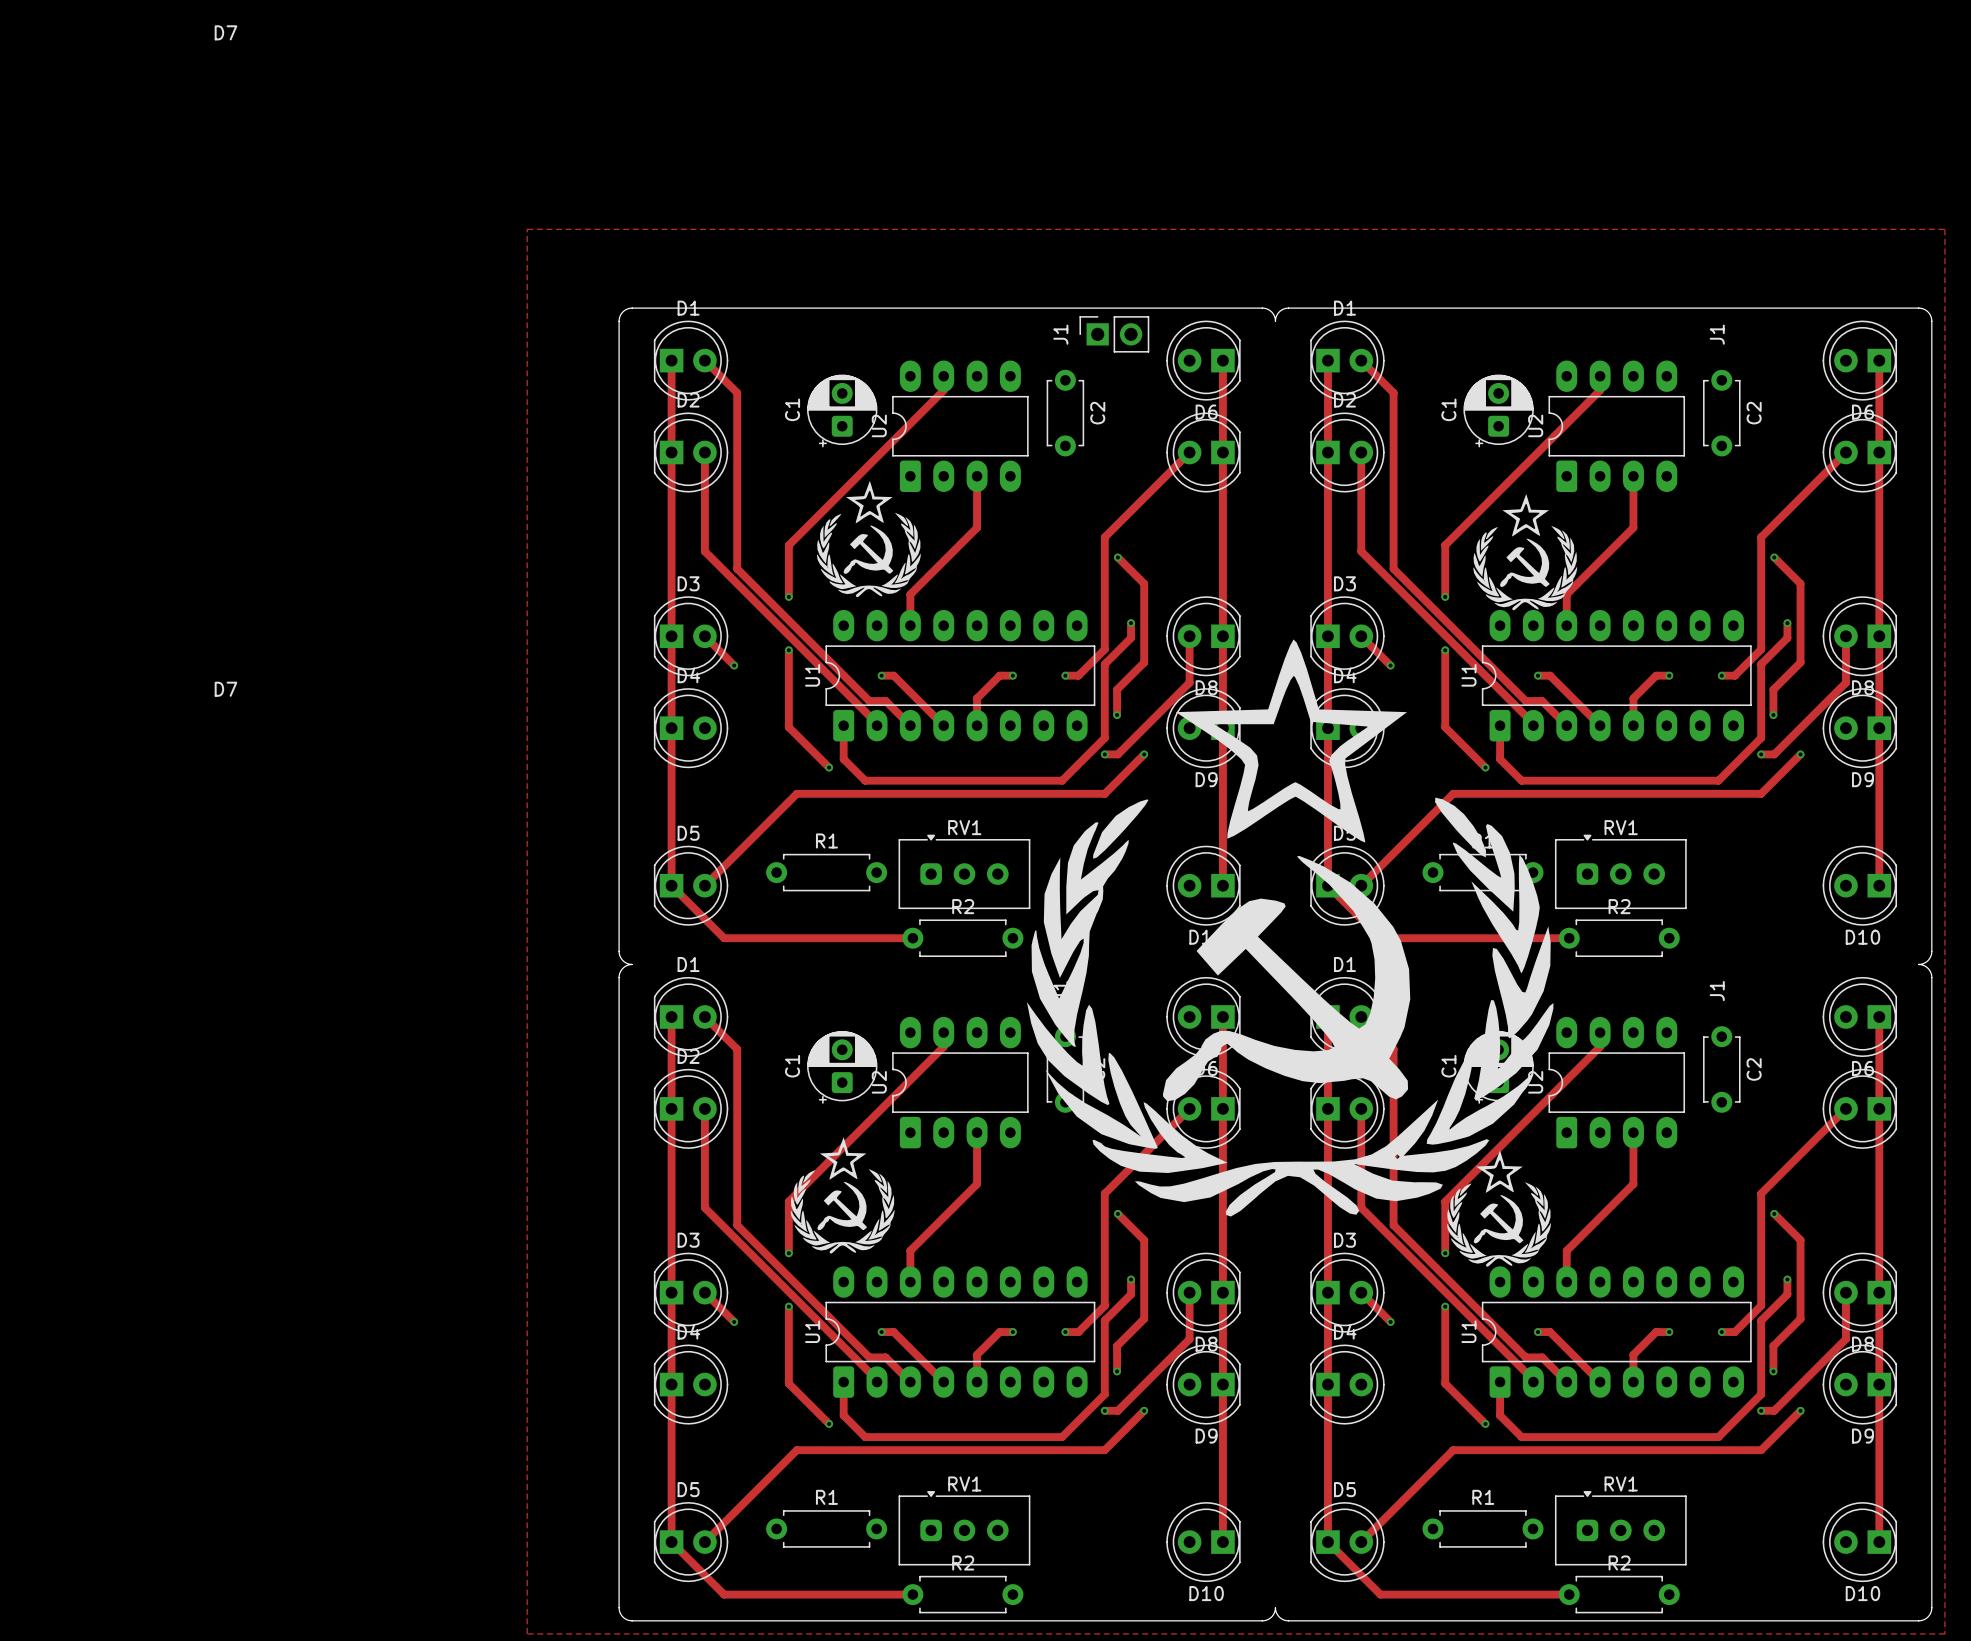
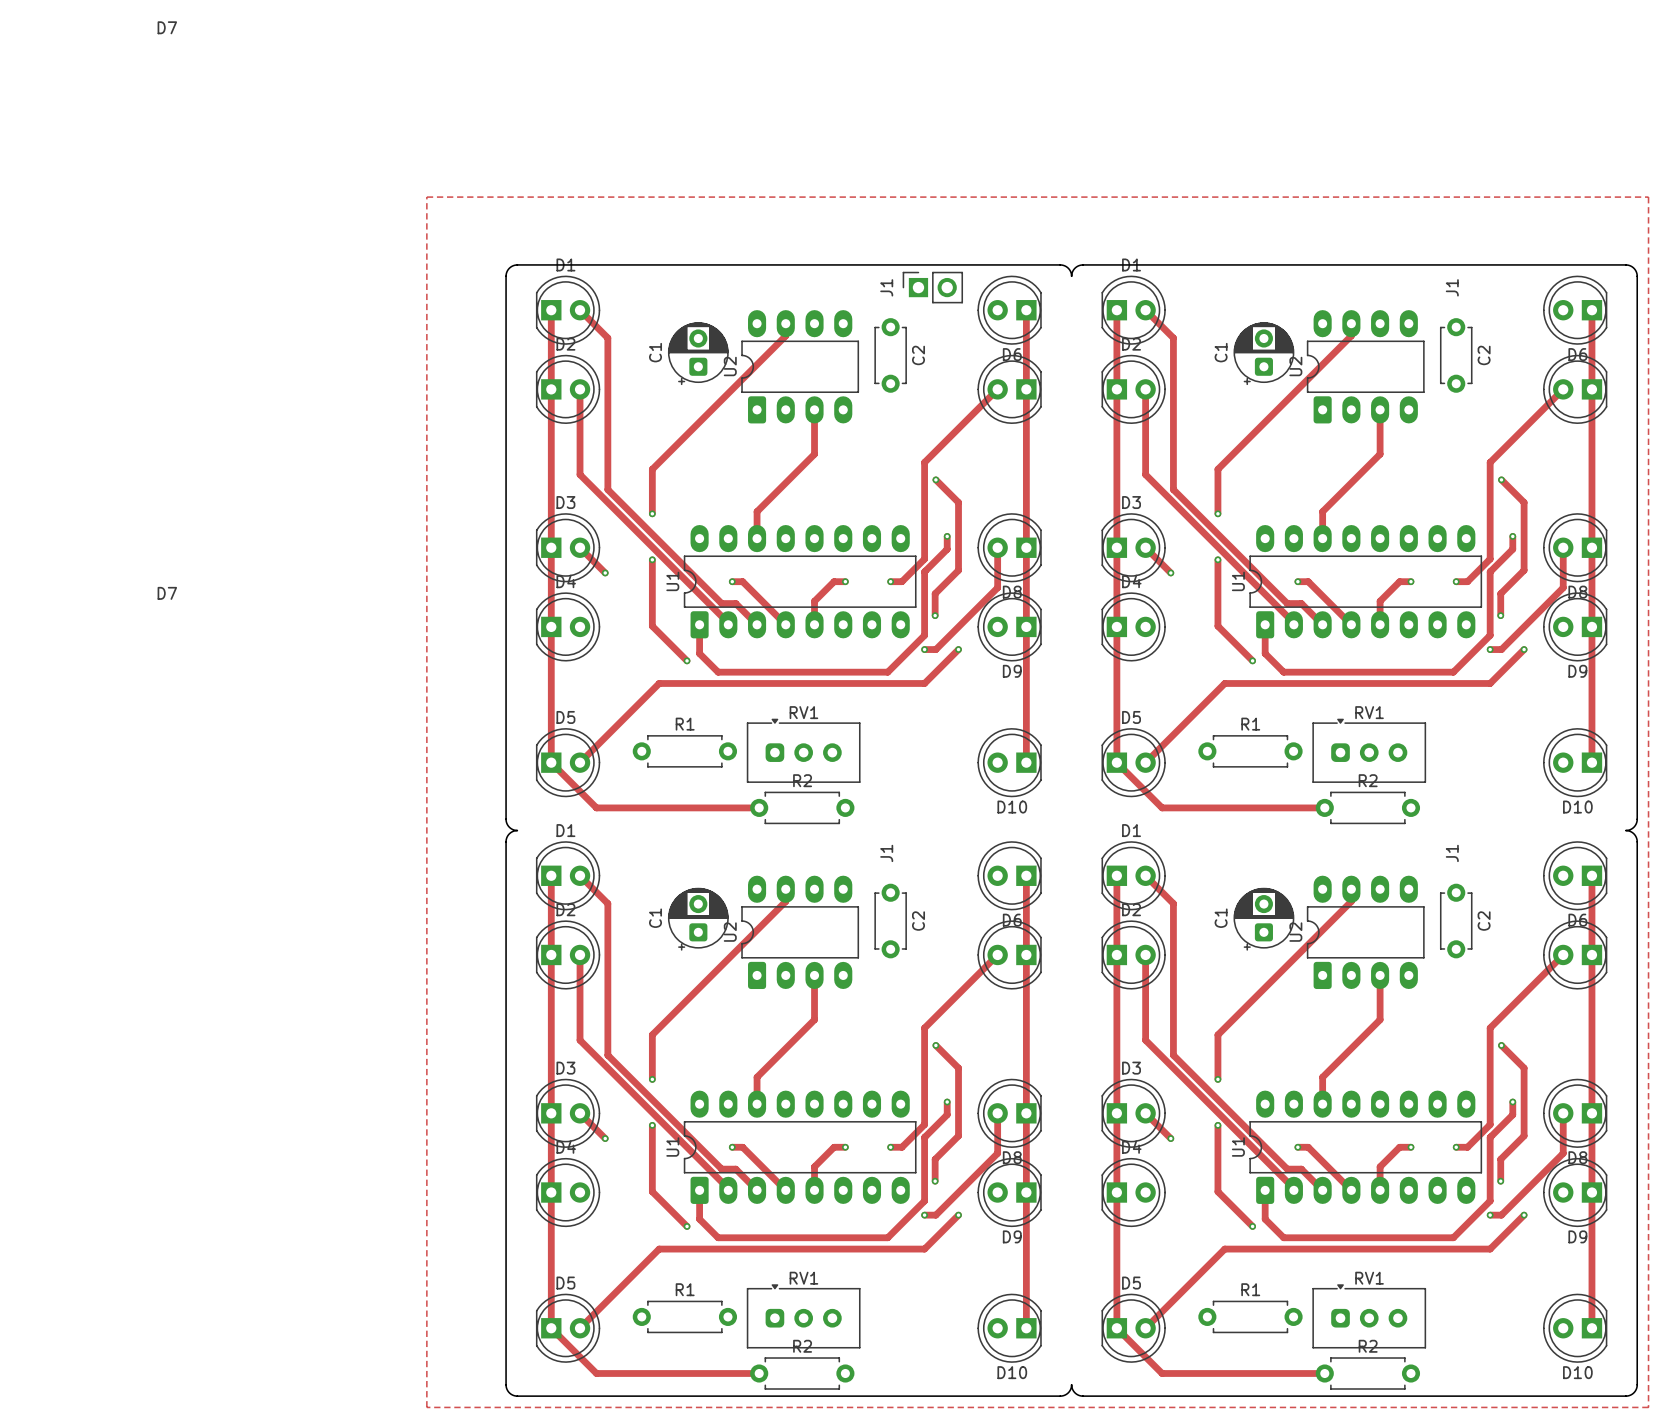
drawing: [816, 480, 921, 598] -> none
drawing: [1473, 493, 1578, 611] -> none
drawing: [1026, 639, 1554, 1267] -> none
drawing: [790, 1137, 895, 1254] -> none

